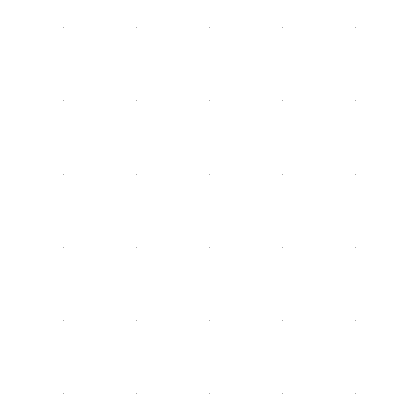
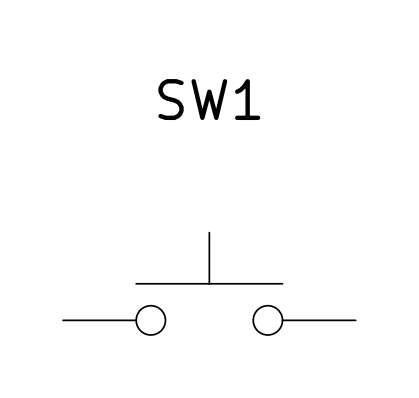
SW1: none -> (209, 283)

